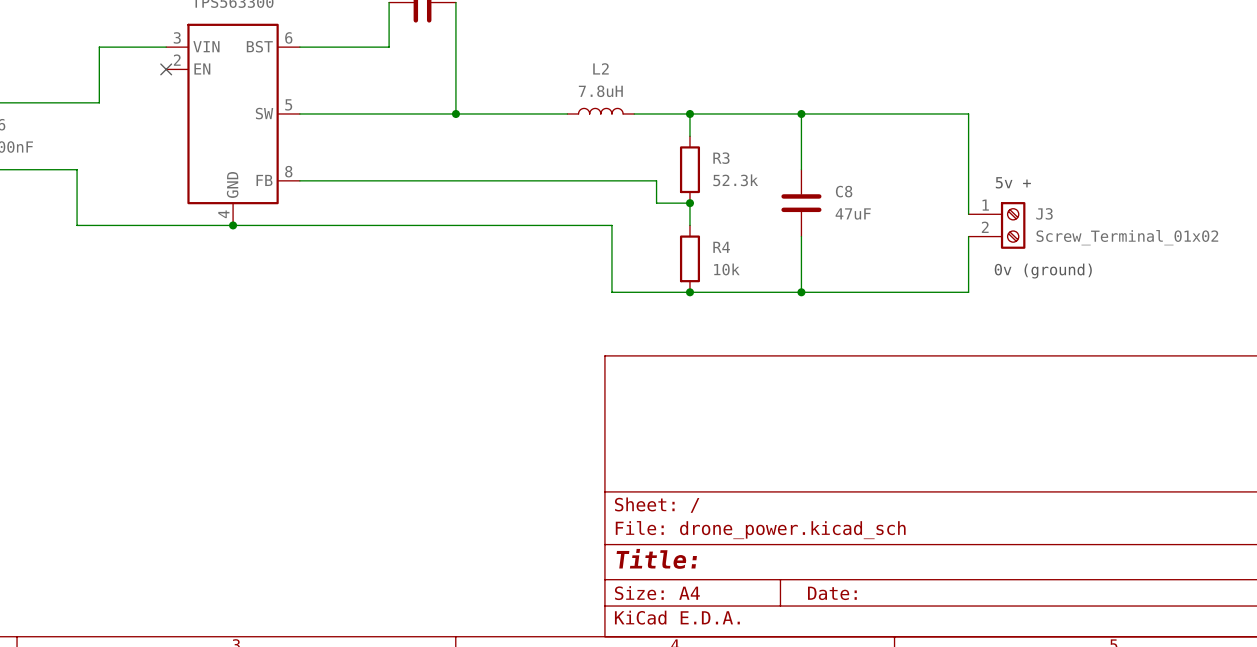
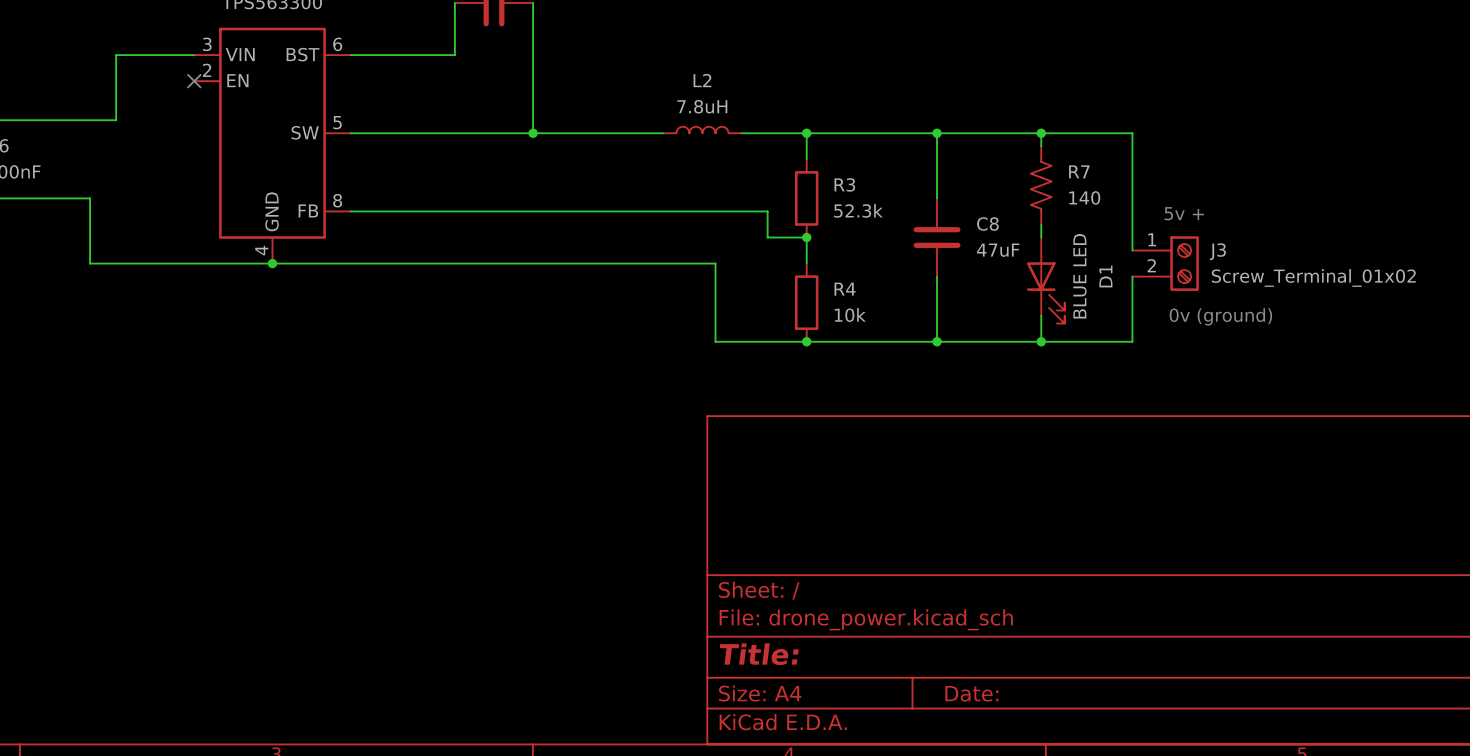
wire: none -> (1041, 133) (1041, 146)
junction: none -> (1041, 133)
R7: none -> 140 (1041, 185)
wire: none -> (1041, 224) (1041, 237)
D1: none -> BLUE LED (1045, 280)
wire: none -> (1041, 315) (1041, 341)
junction: none -> (1041, 341)

